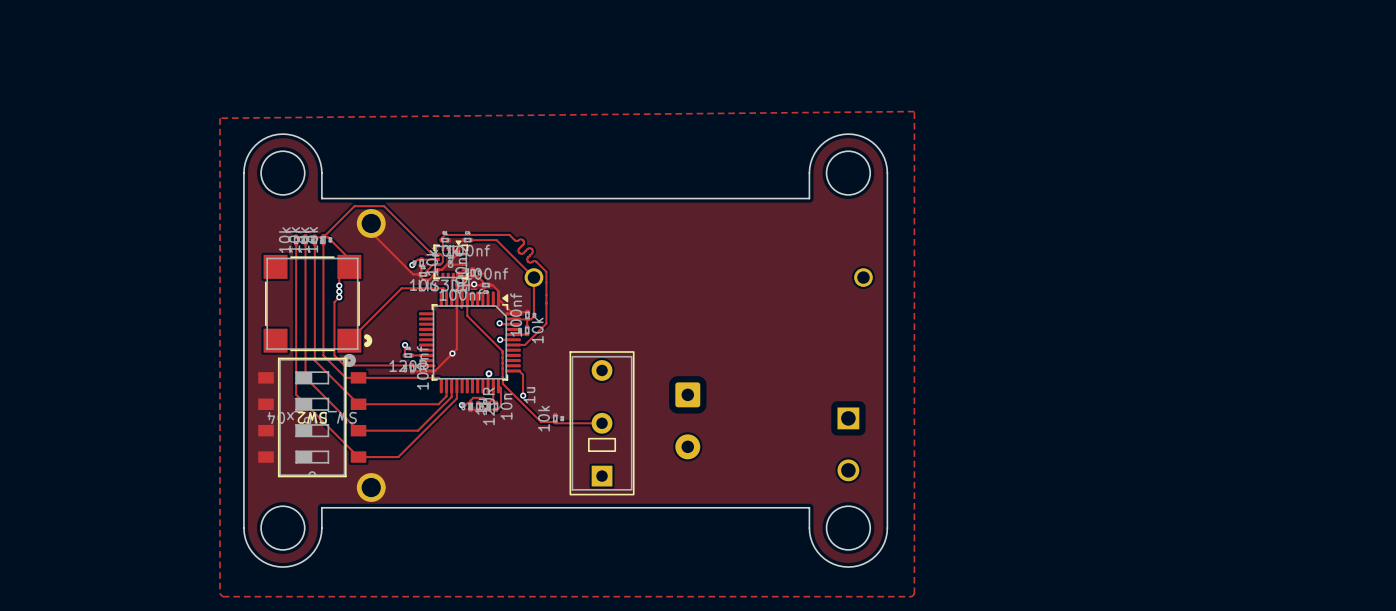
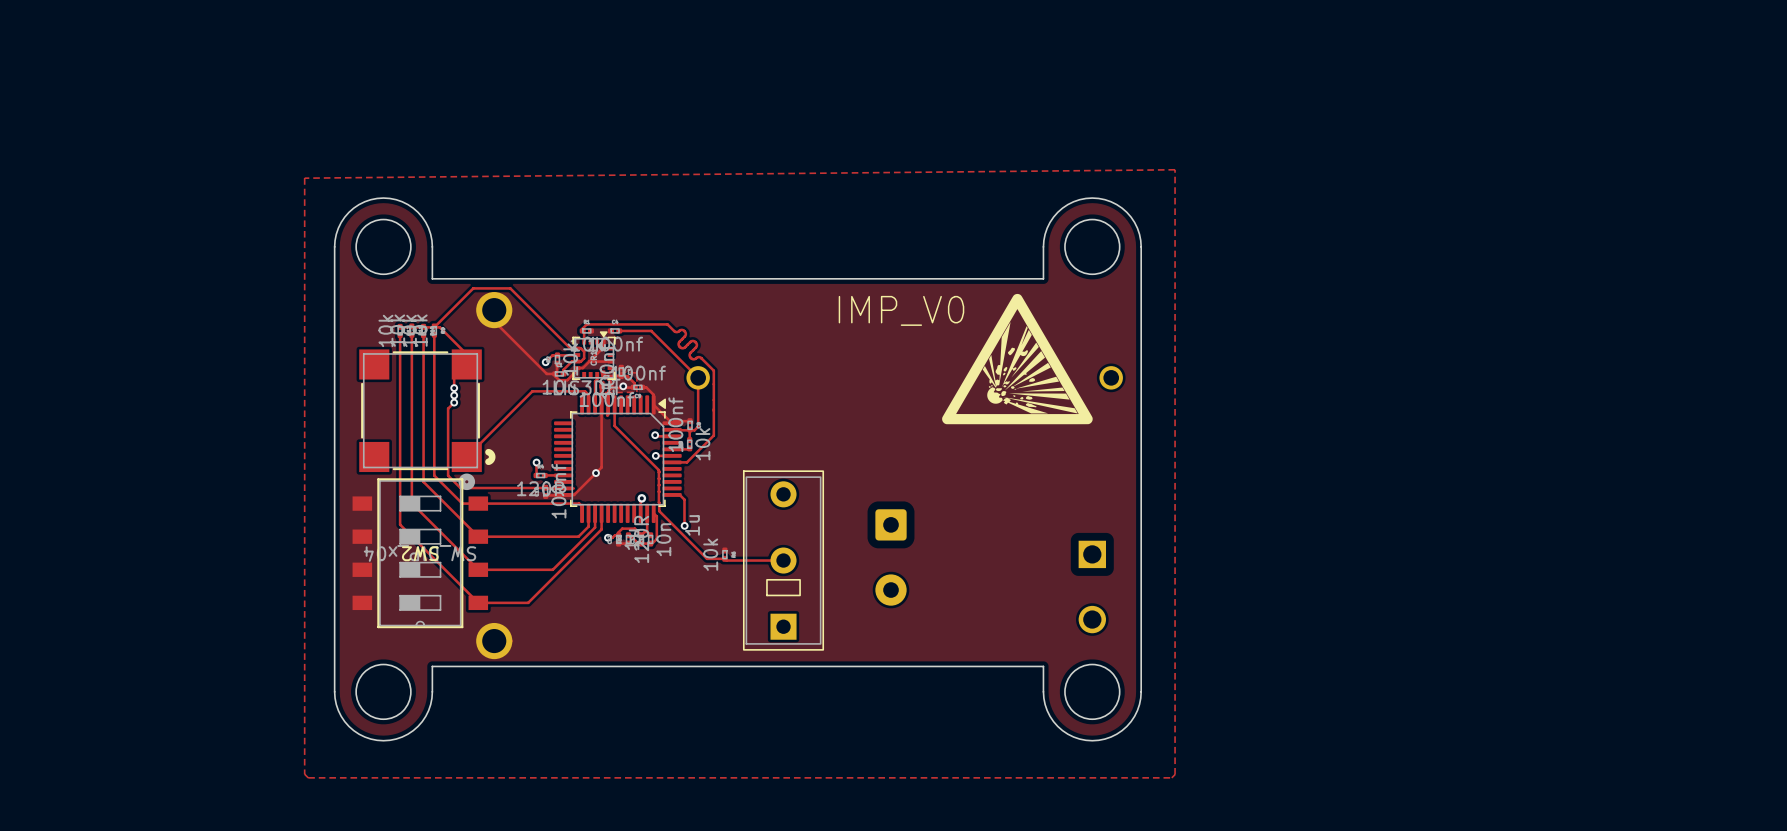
drawing: none -> [942, 293, 1093, 425]
text: none -> IMP_V0 (901, 310)

